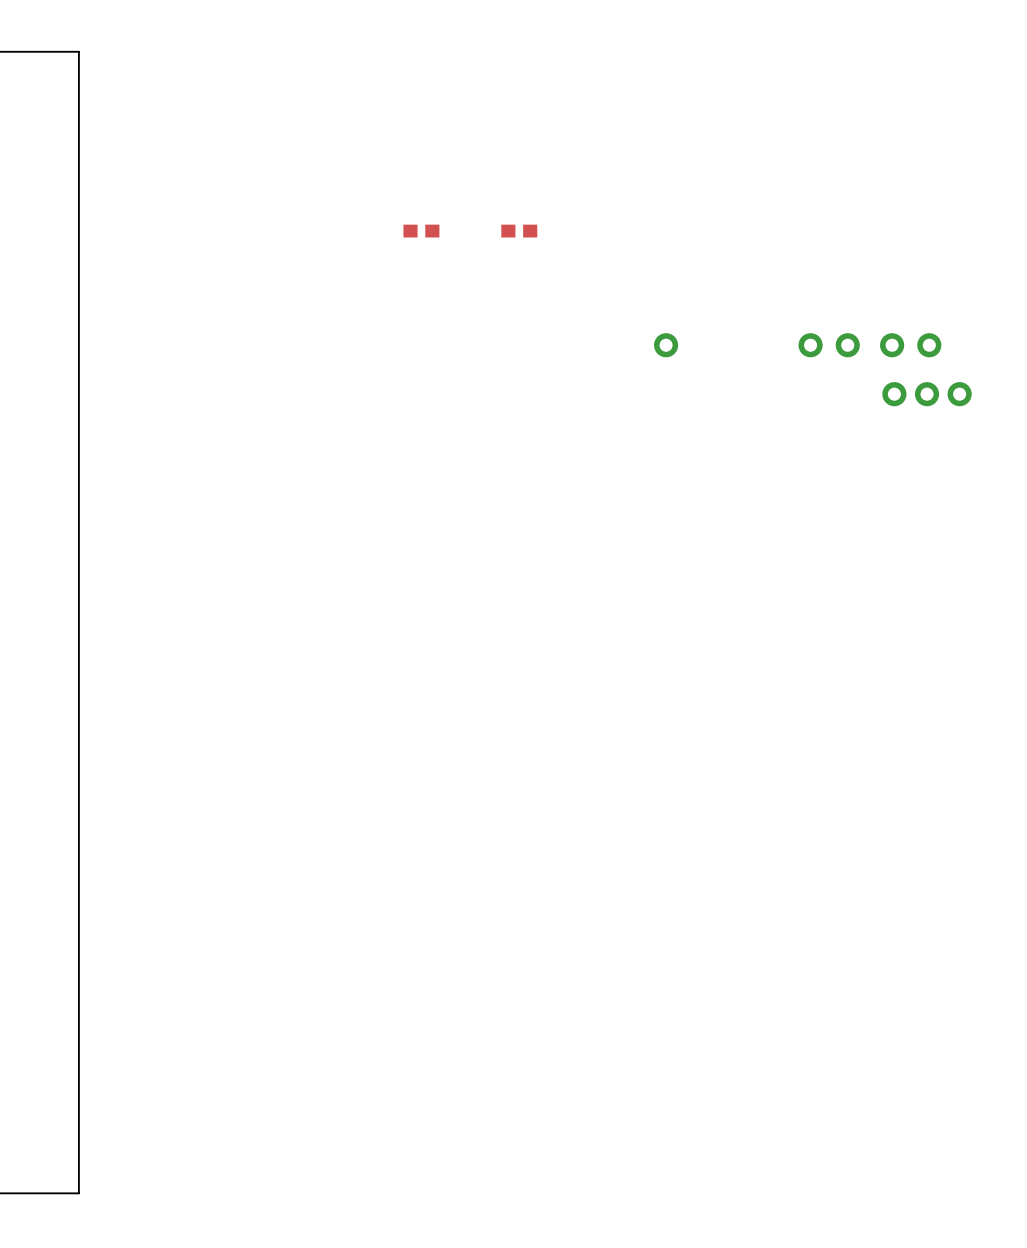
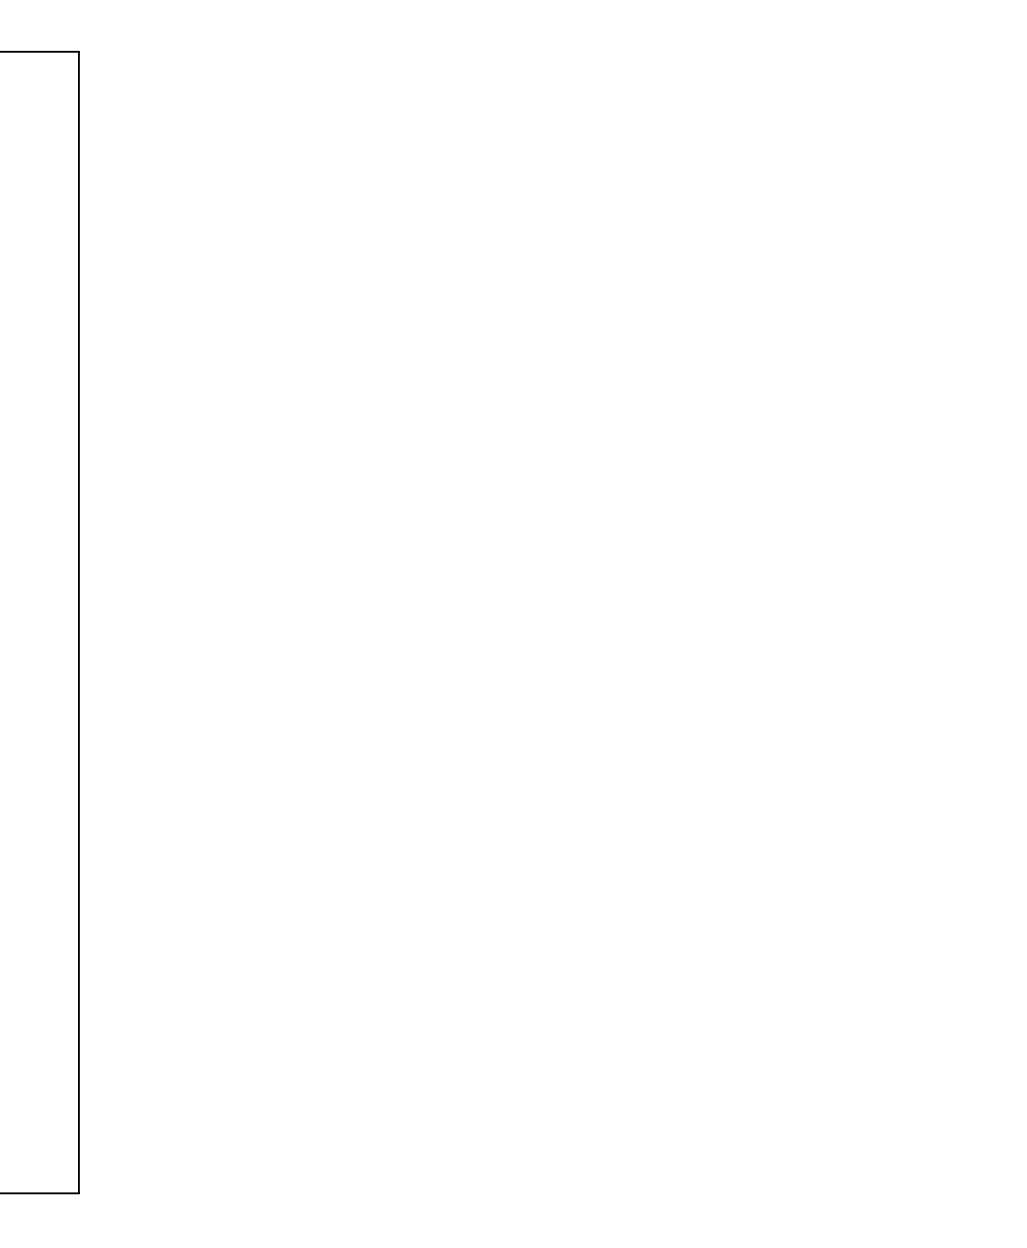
part: (421, 231) -> none
part: (519, 231) -> none
part: (666, 345) -> none
part: (829, 345) -> none
part: (910, 345) -> none
part: (927, 394) -> none

